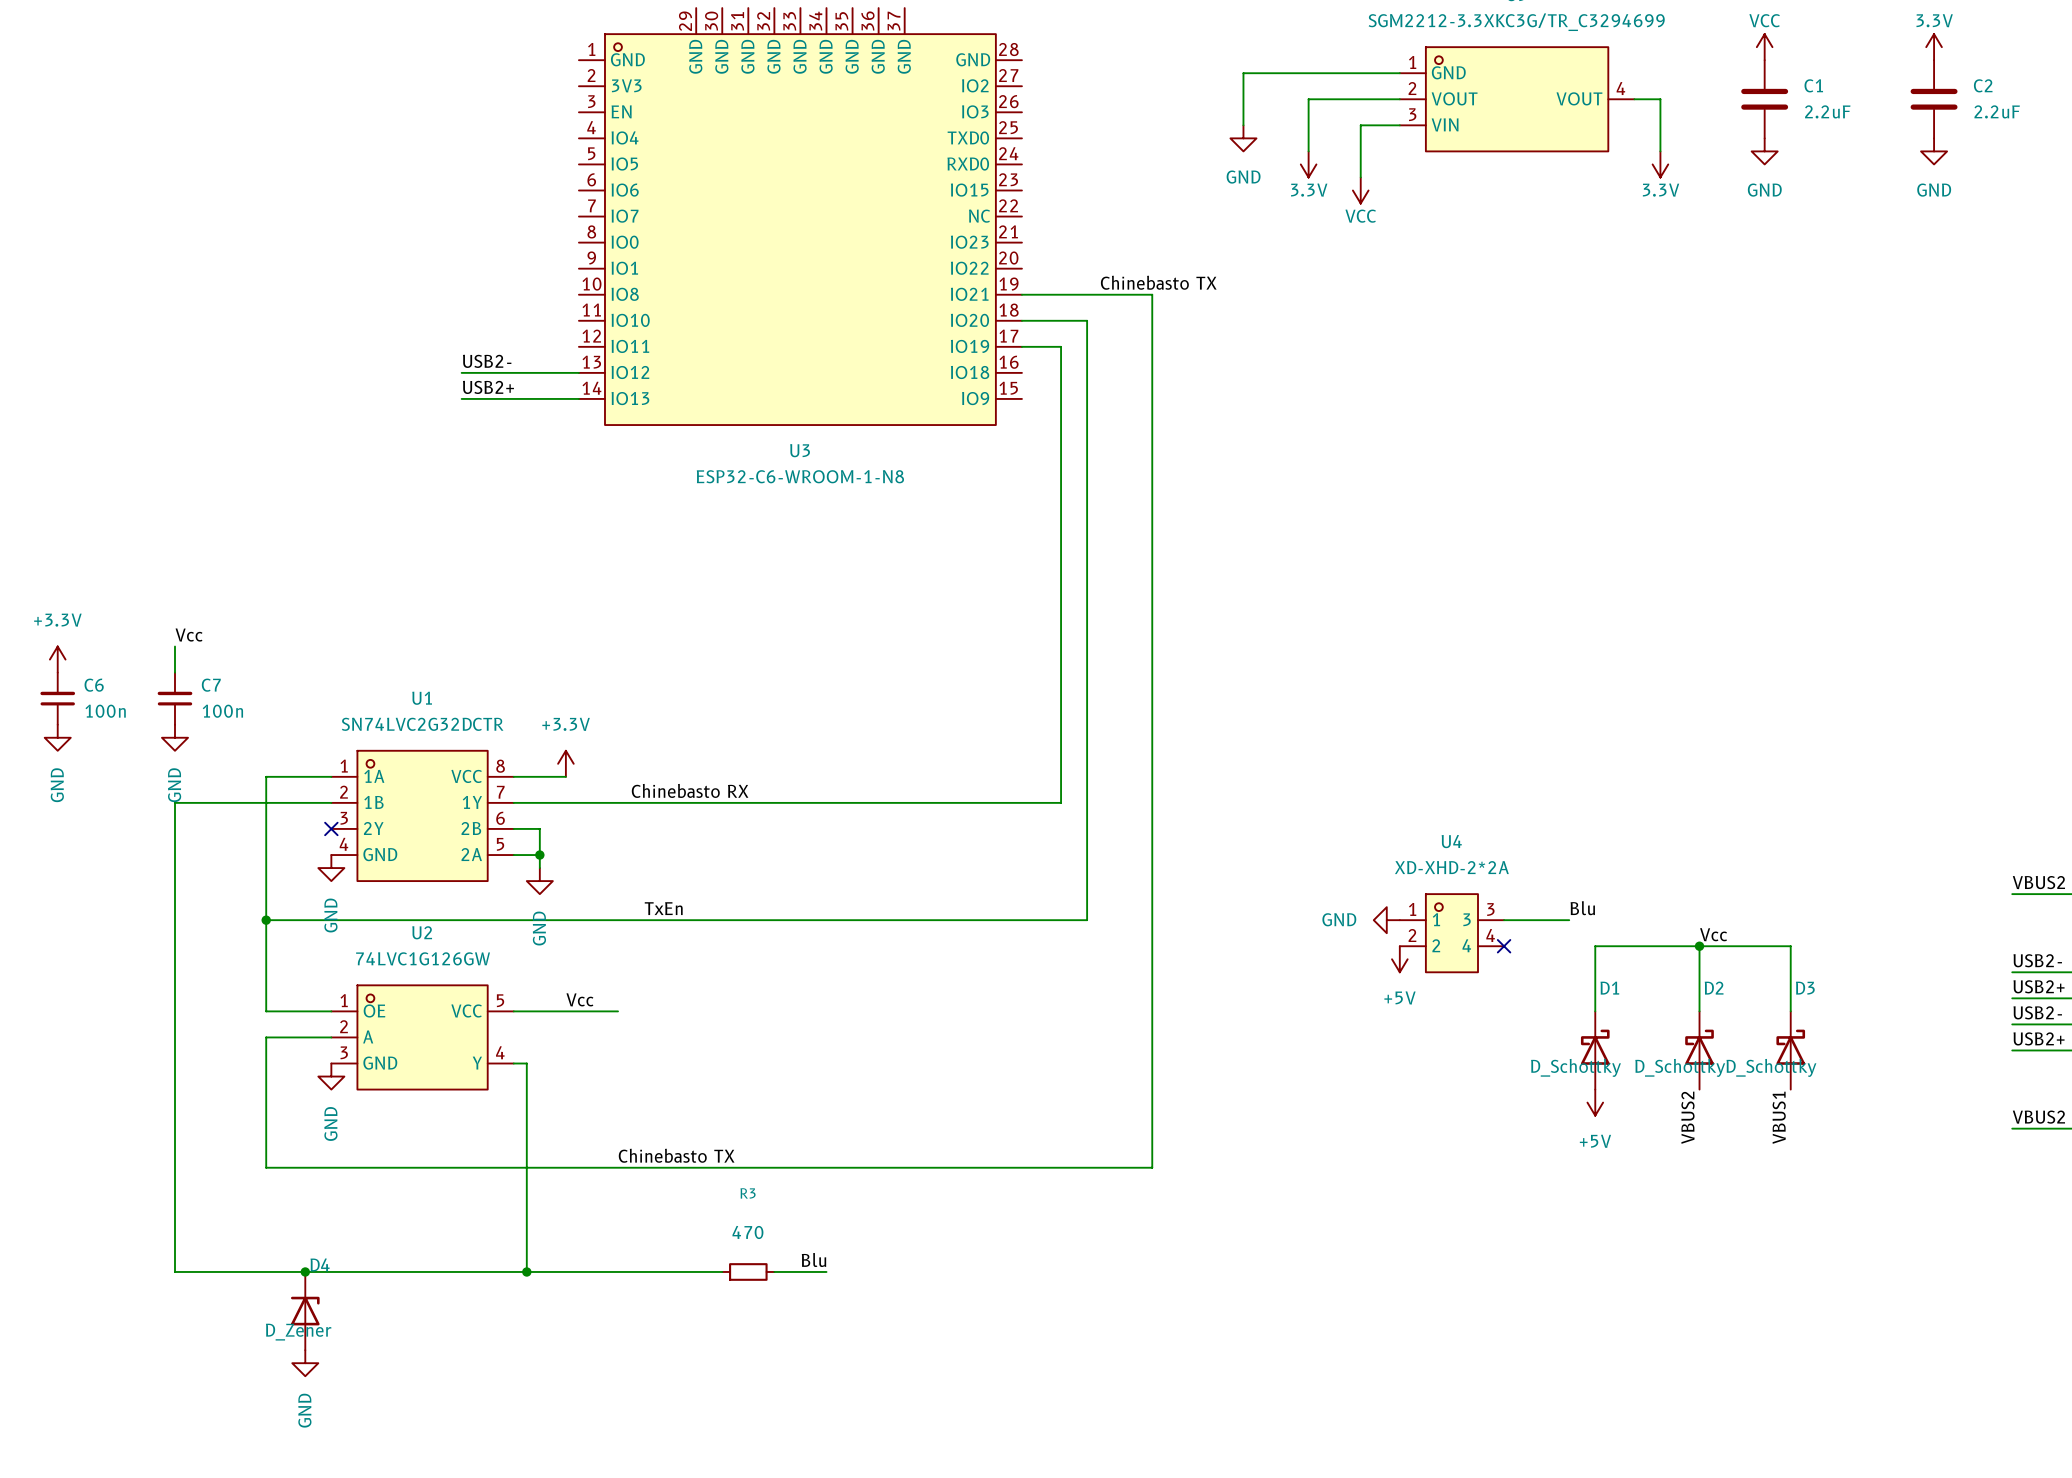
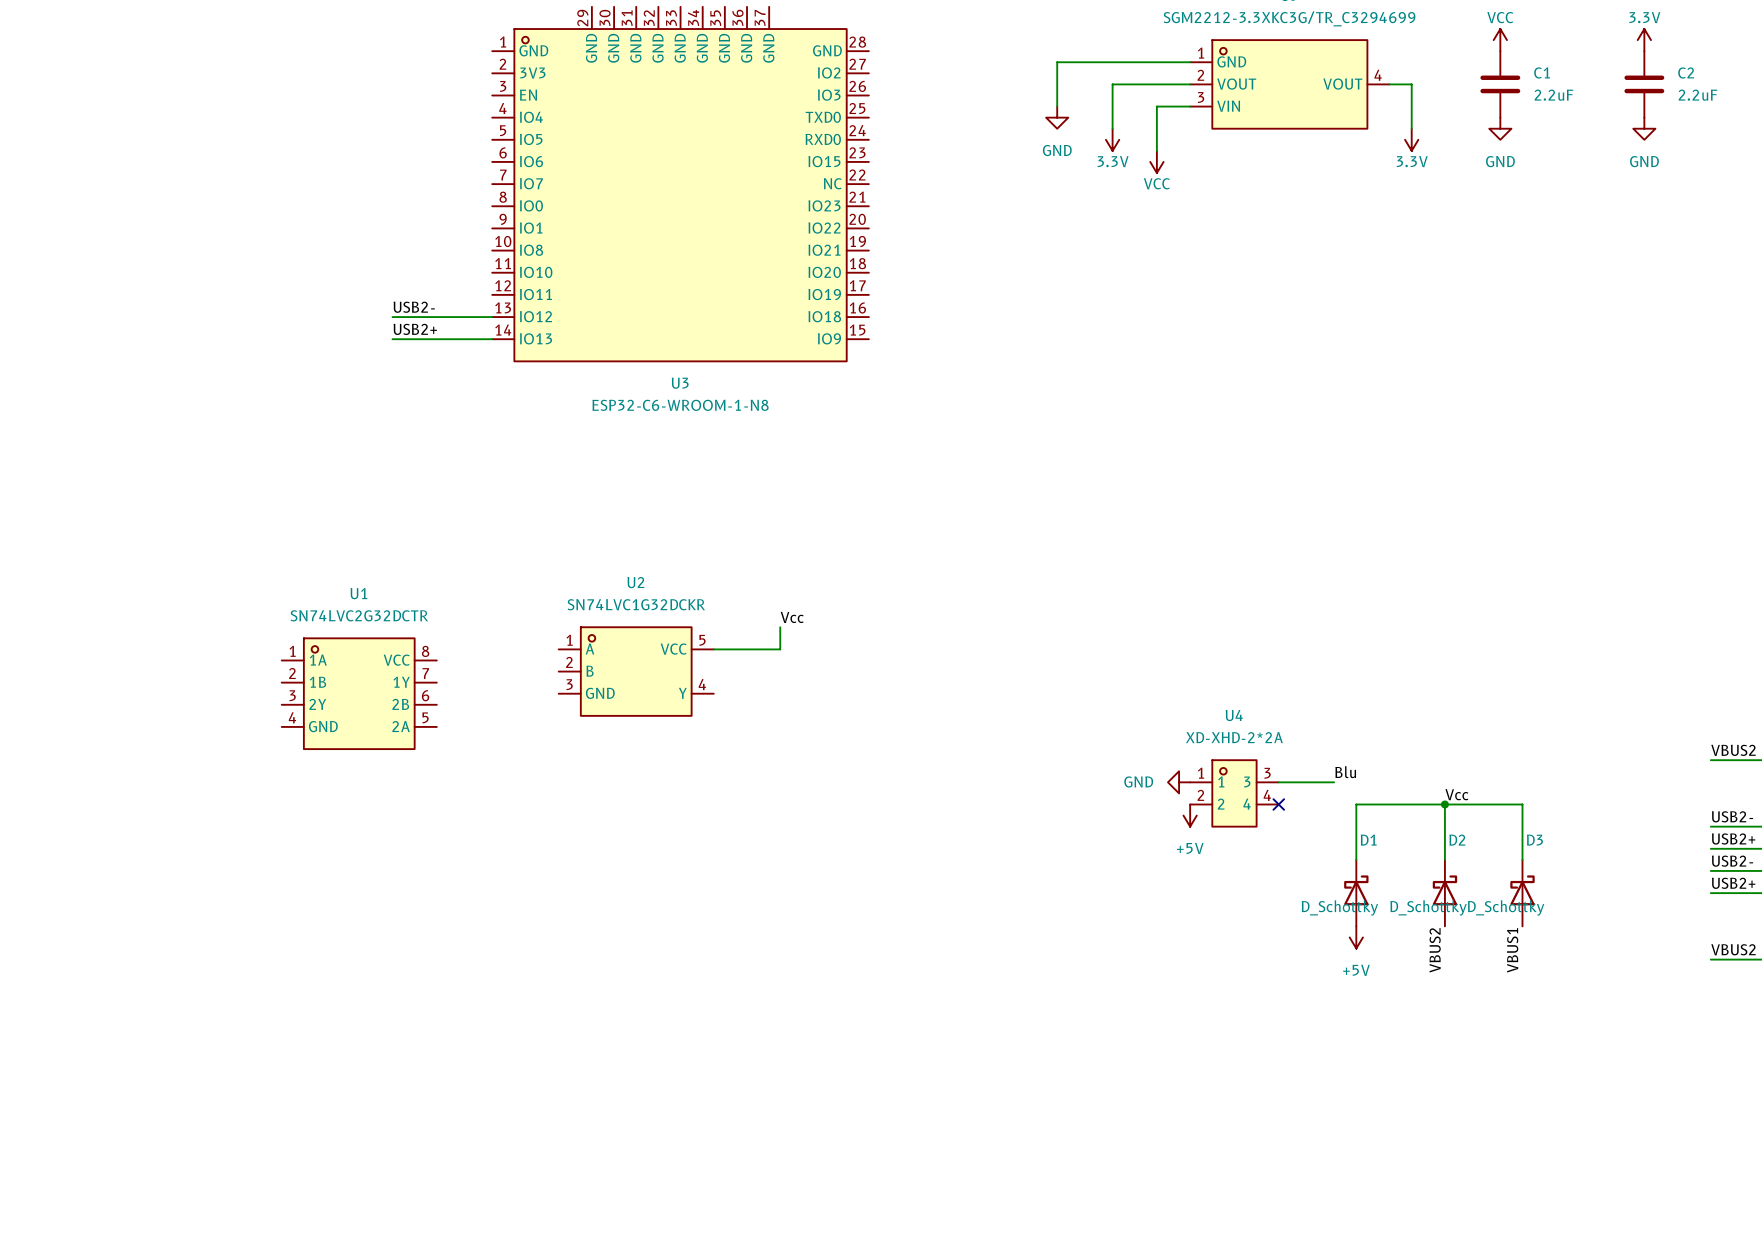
label: Chinebasto TX (1158, 282) -> none
wire: (1021, 294) (1152, 294) (1152, 1167) (266, 1167) (266, 1037) (331, 1037) -> none
wire: (1021, 320) (1087, 320) (1087, 920) (266, 920) -> none
wire: (1021, 346) (1061, 346) (1061, 802) (513, 802) -> none
label: Vcc (189, 635) -> none
wire: (174, 646) (174, 672) -> none
power symbol: +3.3V (57, 659) -> none
C6: 100n (57, 698) -> none
C7: 100n (174, 698) -> none
label: none -> Vcc (792, 617)
power symbol: GND (57, 737) -> none
power symbol: GND (174, 737) -> none
wire: none -> (780, 627) (780, 649) (713, 649)
power symbol: +3.3V (565, 763) -> none
wire: (331, 776) (266, 776) (266, 1011) (331, 1011) -> none
wire: (513, 776) (565, 776) -> none
label: Chinebasto RX (690, 790) -> none
wire: (331, 802) (174, 802) (174, 1271) (722, 1271) -> none
no-connect mark: (331, 828) -> none
wire: (513, 828) (539, 828) (539, 868) -> none
wire: (513, 855) (539, 855) -> none
junction: (539, 855) -> none
power symbol: GND (331, 868) -> none
power symbol: GND (539, 881) -> none
label: TxEn (663, 908) -> none
junction: (266, 920) -> none
U2 value: 74LVC1G126GW (423, 958) -> SN74LVC1G32DCKR (636, 604)
label: Vcc (579, 999) -> none
U2 pin name: OE (374, 1010) -> A (589, 648)
wire: (513, 1011) (618, 1011) -> none
U2 pin name: A (368, 1036) -> B (590, 671)
U2 position: (422, 1037) -> (636, 671)
wire: (513, 1063) (526, 1063) (526, 1271) -> none
power symbol: GND (331, 1076) -> none
label: Chinebasto TX (676, 1155) -> none
label: Blu (813, 1260) -> none
junction: (305, 1271) -> none
junction: (526, 1271) -> none
R3: 470 (748, 1271) -> none
wire: (774, 1271) (826, 1271) -> none
D4: D_Zener (305, 1311) -> none
power symbol: GND (305, 1363) -> none

